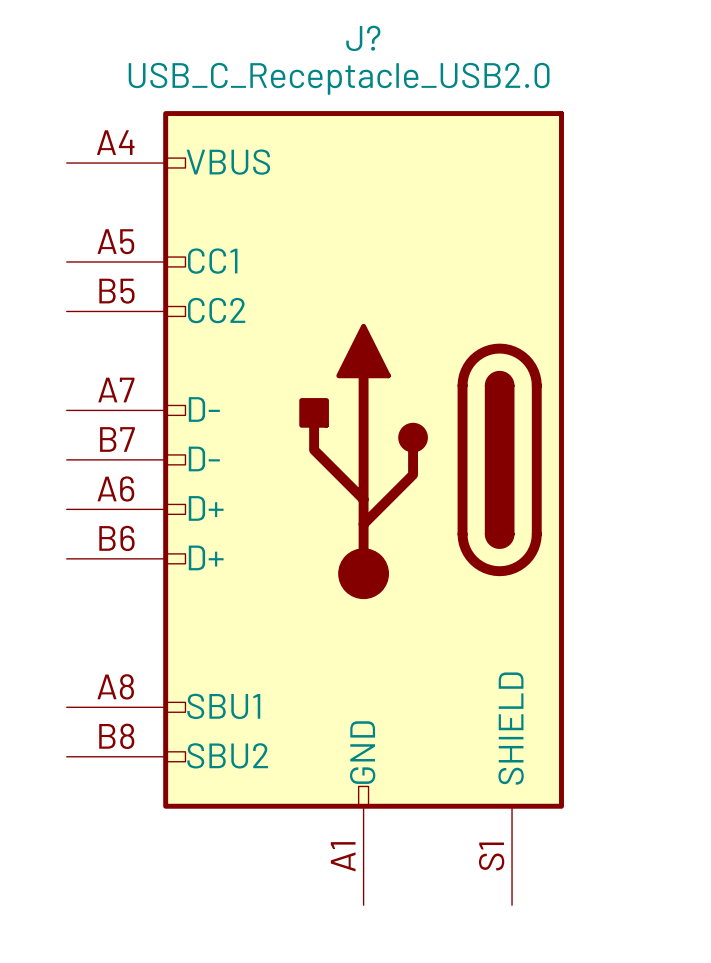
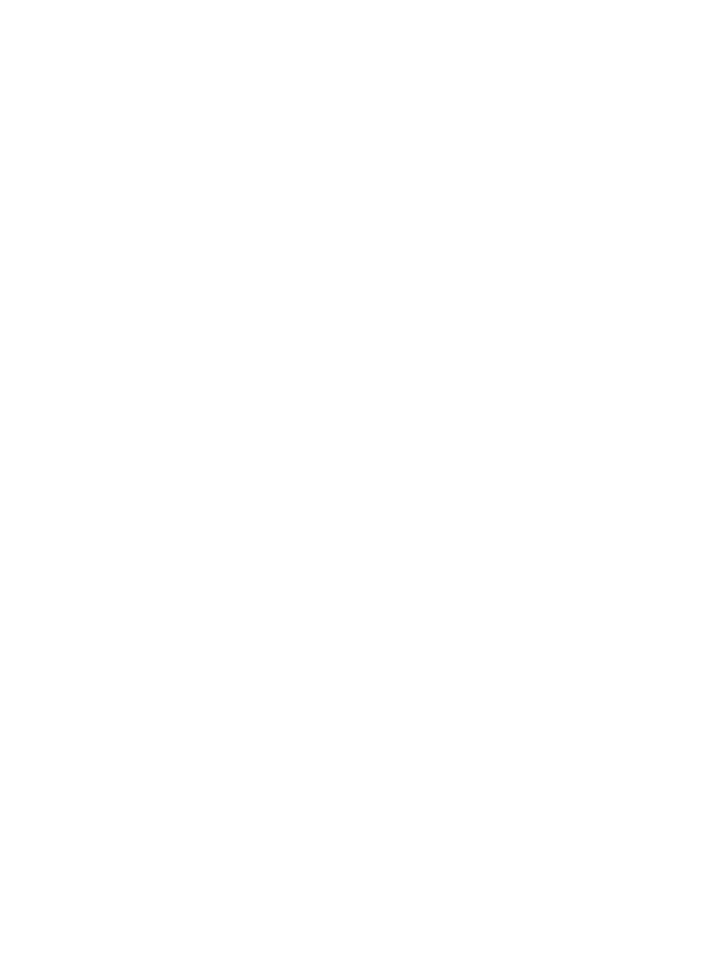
J?: USB_C_Receptacle_USB2.0 (315, 508) -> none

